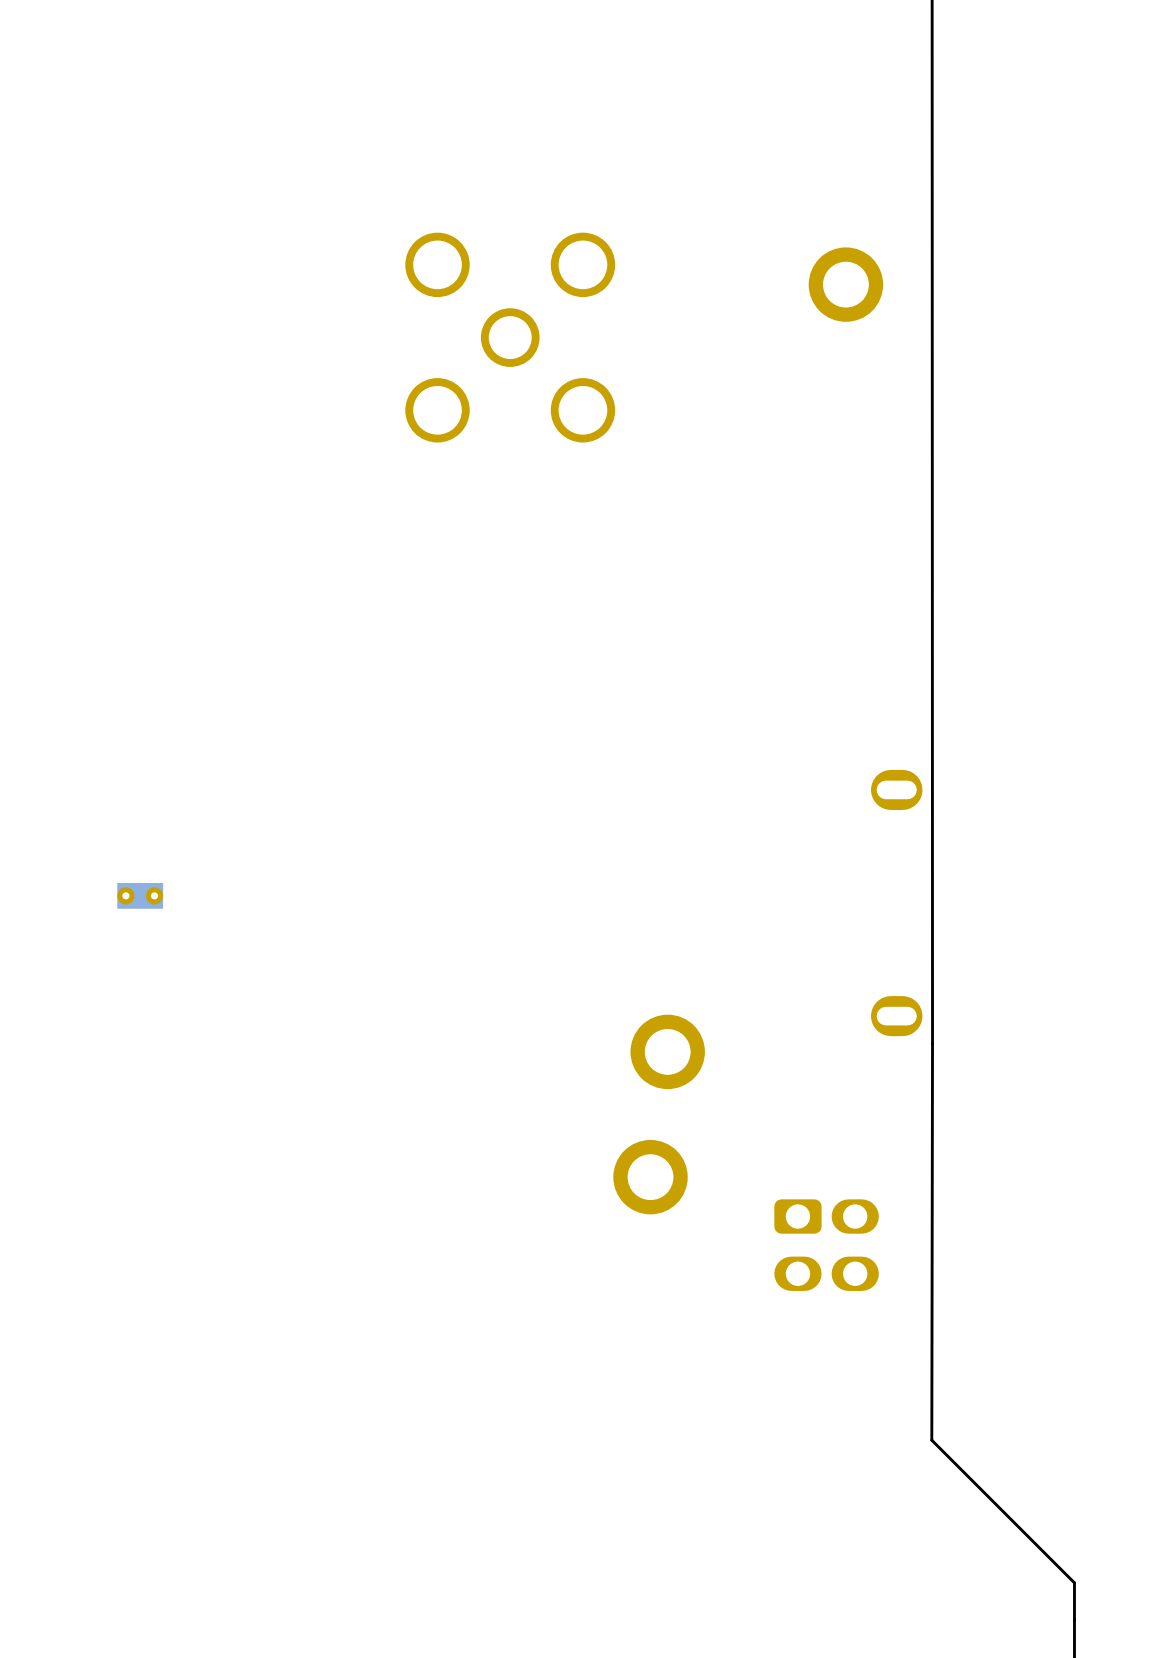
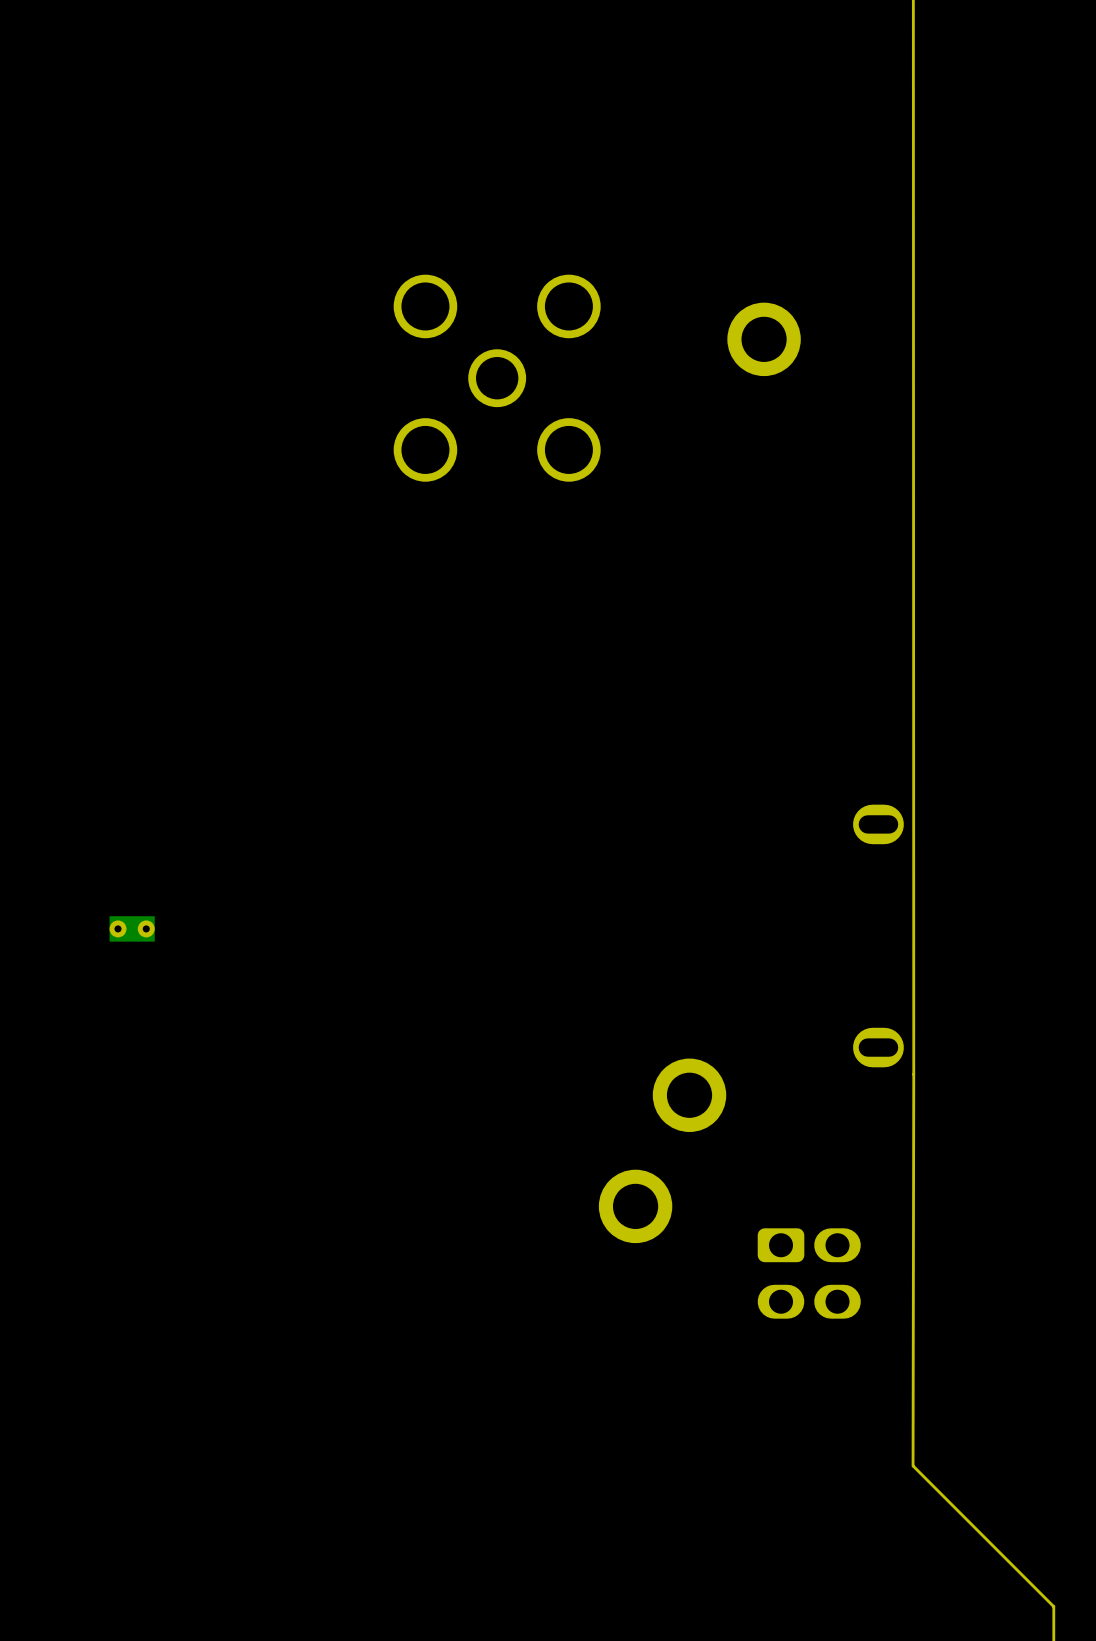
part position: (845, 284) -> (764, 339)
part position: (667, 1051) -> (689, 1095)

